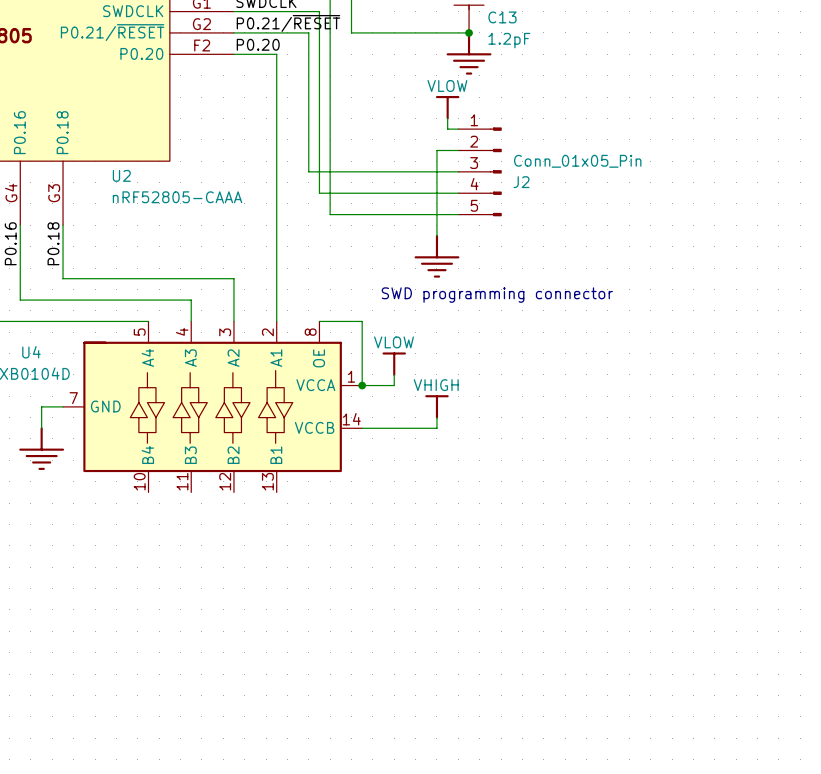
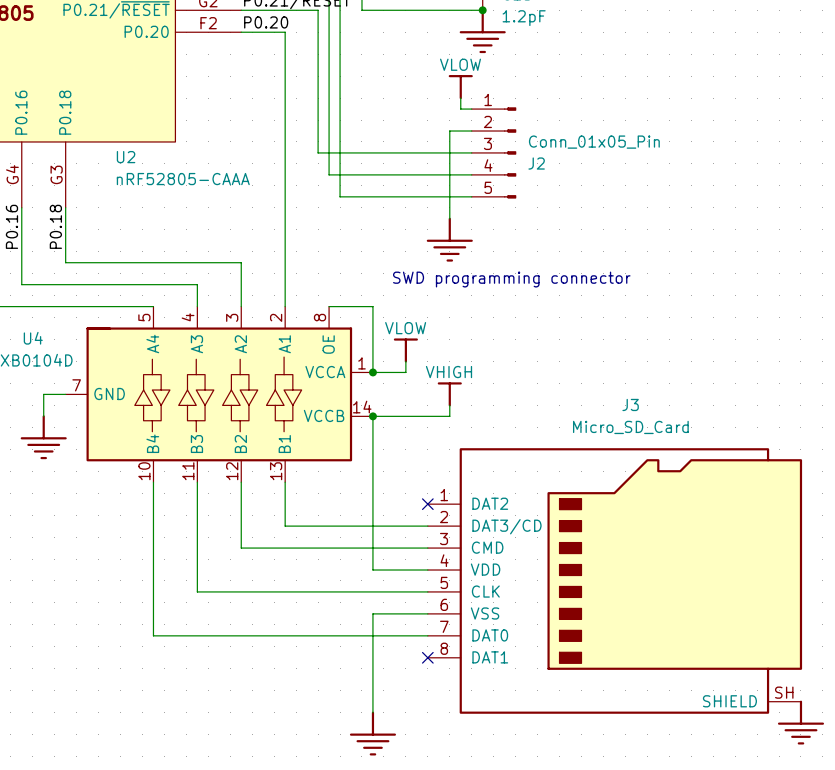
wire: none -> (372, 416) (372, 570) (427, 570)
junction: none -> (372, 416)
wire: none -> (153, 482) (153, 635) (427, 635)
wire: none -> (197, 482) (197, 591) (427, 591)
wire: none -> (241, 482) (241, 548) (427, 548)
wire: none -> (285, 482) (285, 526) (427, 526)
no-connect mark: none -> (427, 504)
J3: none -> Micro_SD_Card (614, 580)
wire: none -> (427, 613) (372, 613) (372, 712)
no-connect mark: none -> (427, 657)
power symbol: none -> (800, 722)
power symbol: none -> (372, 733)

